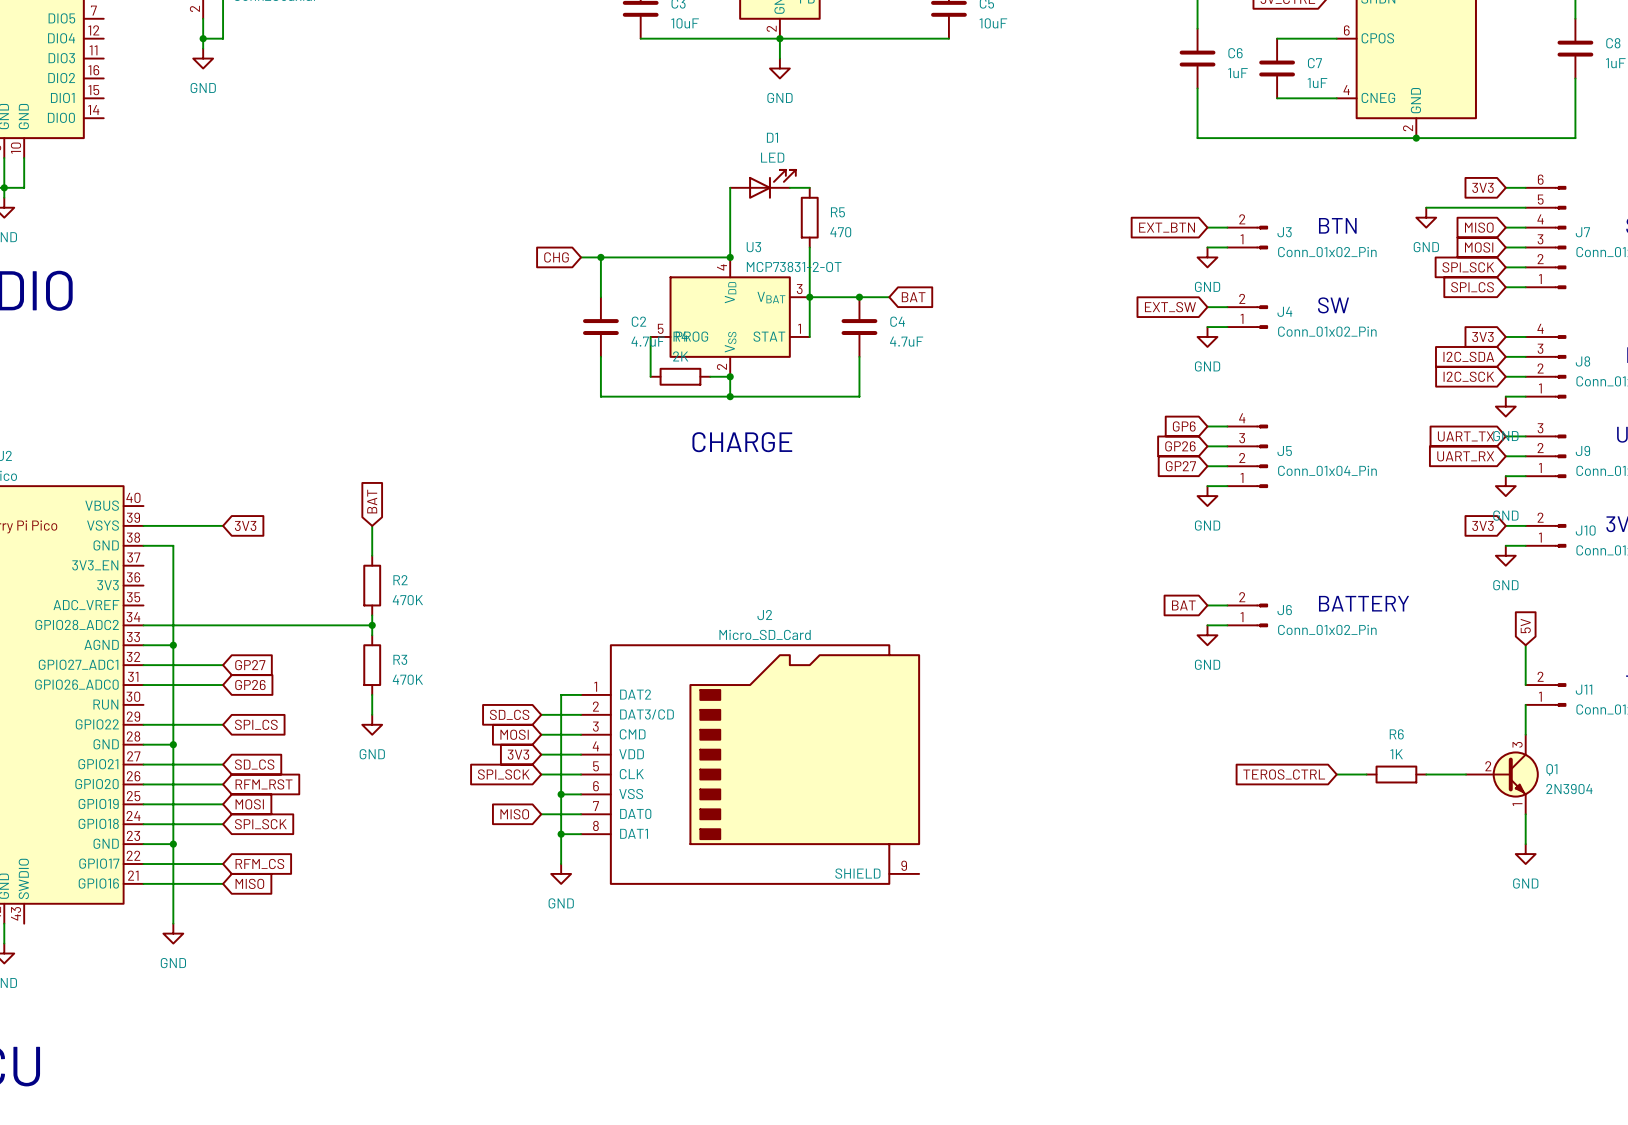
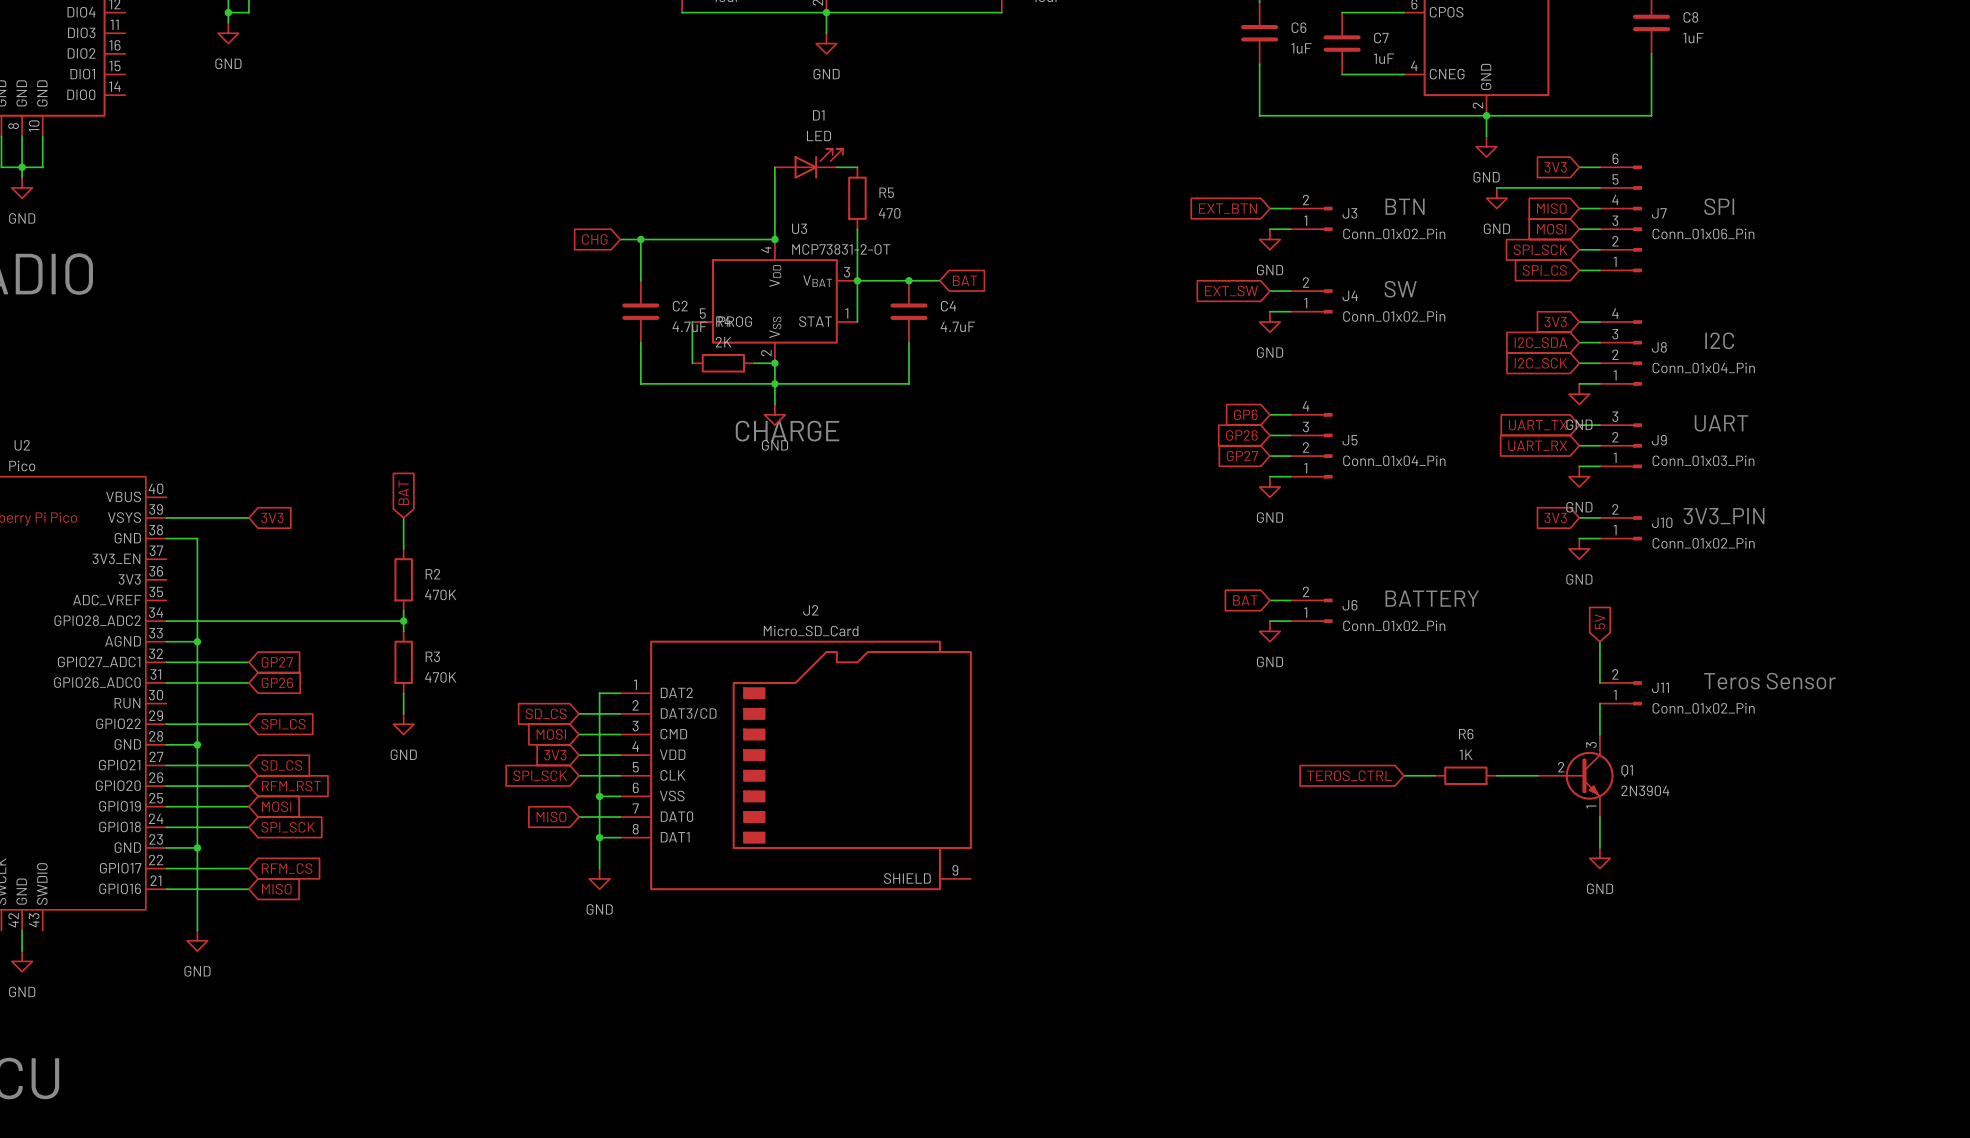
wire: none -> (1486, 115) (1486, 136)
power symbol: none -> GND (1486, 146)
wire: none -> (774, 383) (774, 404)
power symbol: none -> GND (774, 414)

